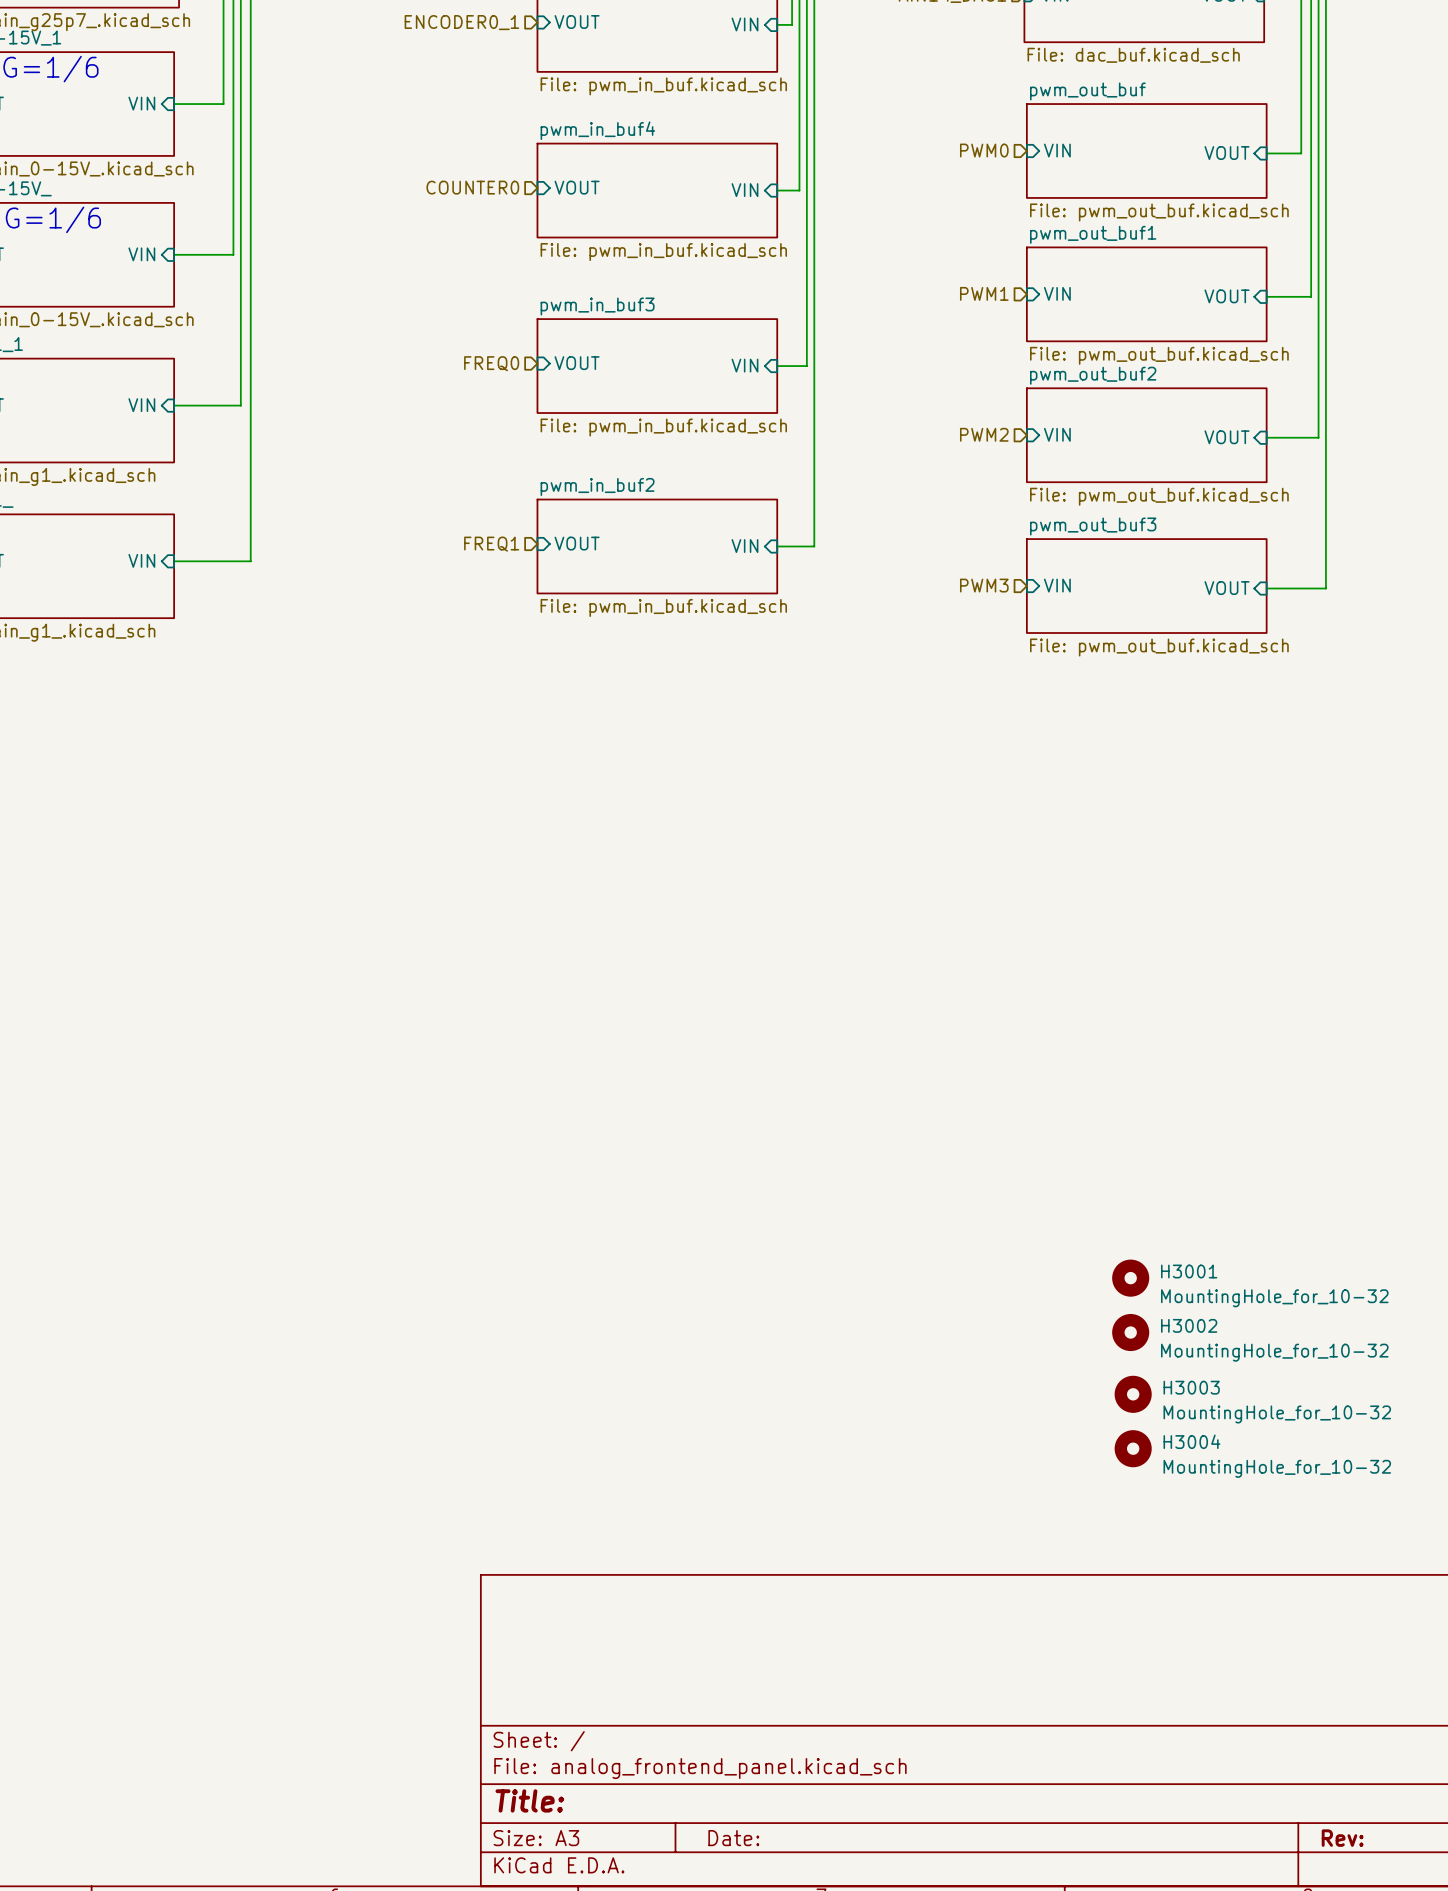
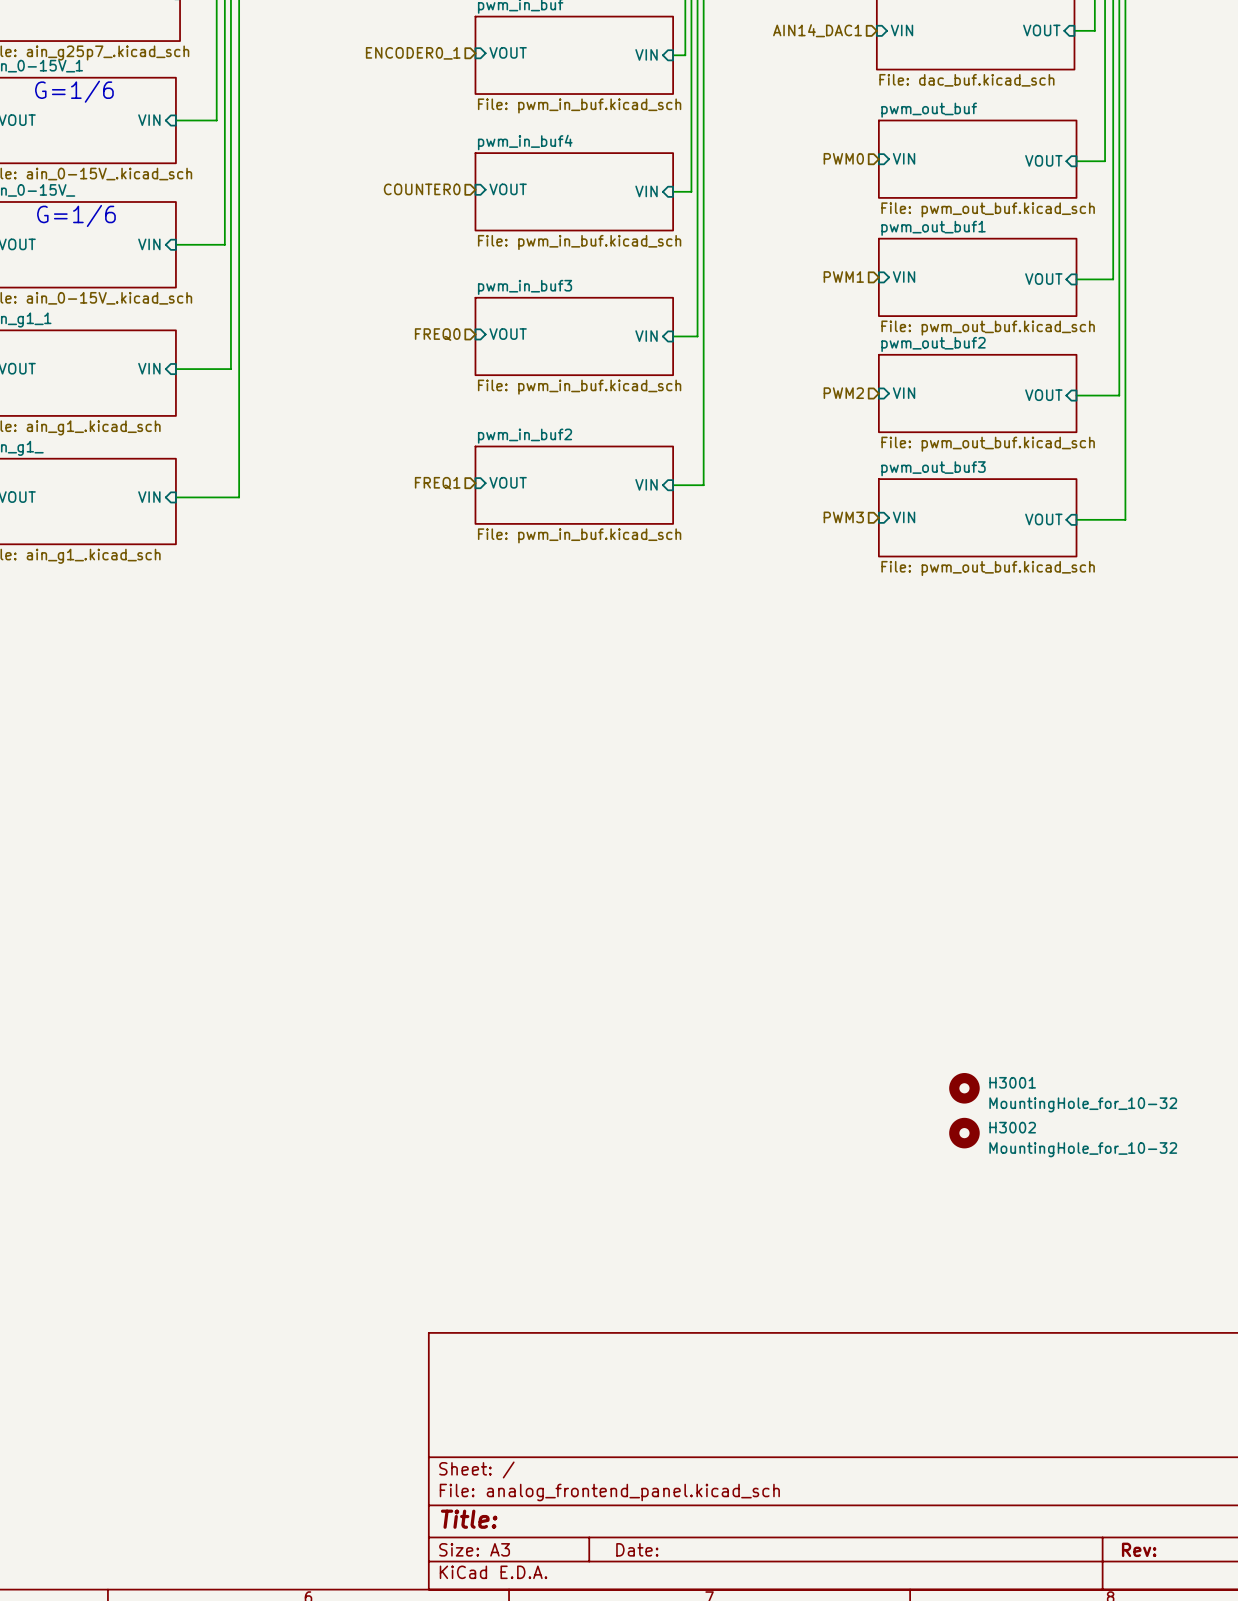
H3003: MountingHole_for_10-32 (1133, 1394) -> none
H3004: MountingHole_for_10-32 (1133, 1448) -> none

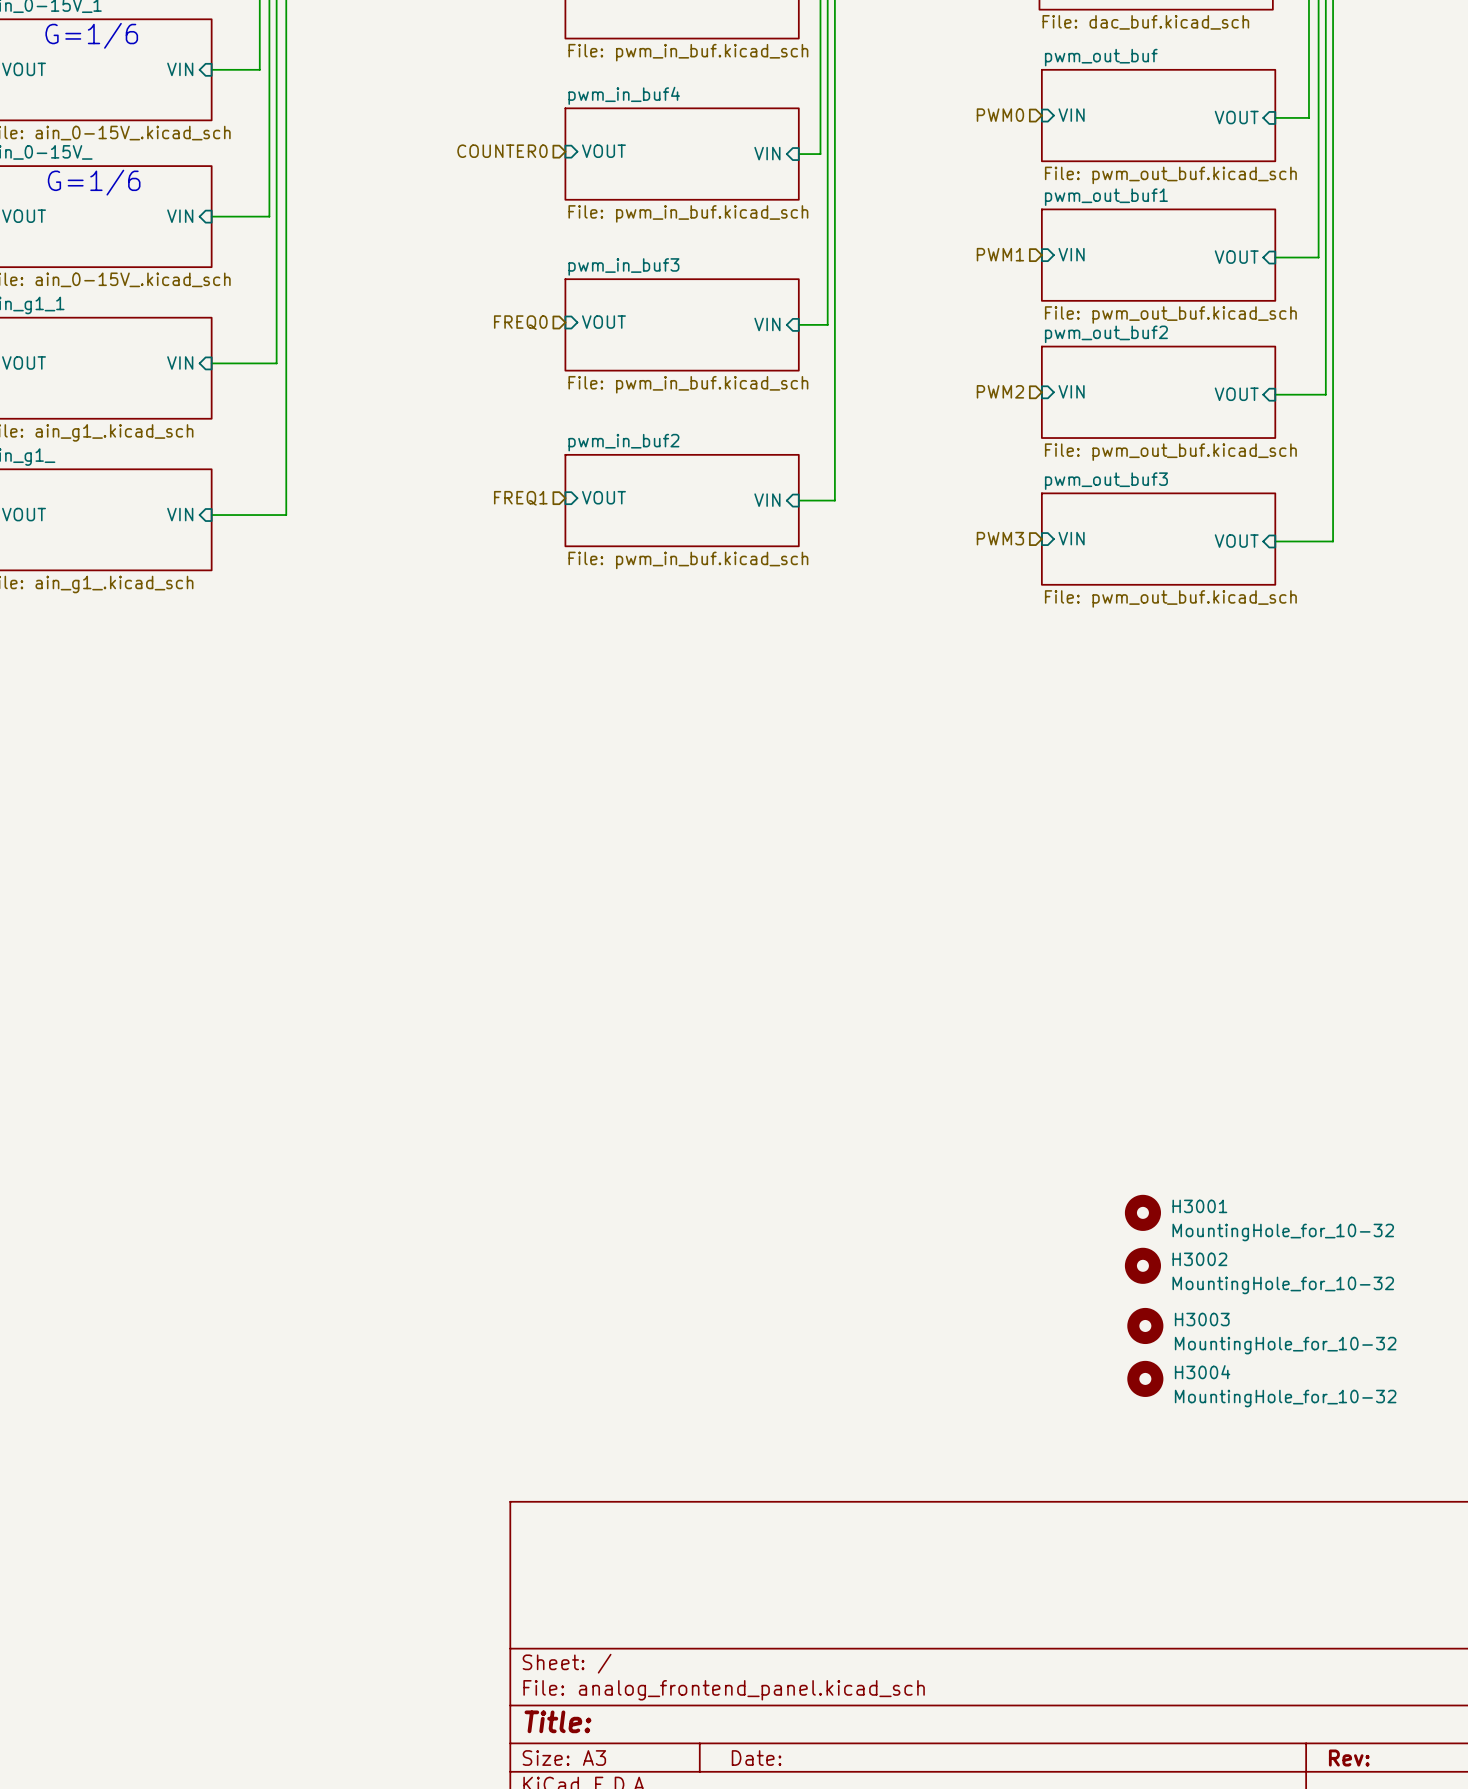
H3003: none -> MountingHole_for_10-32 (1145, 1325)
H3004: none -> MountingHole_for_10-32 (1145, 1378)

